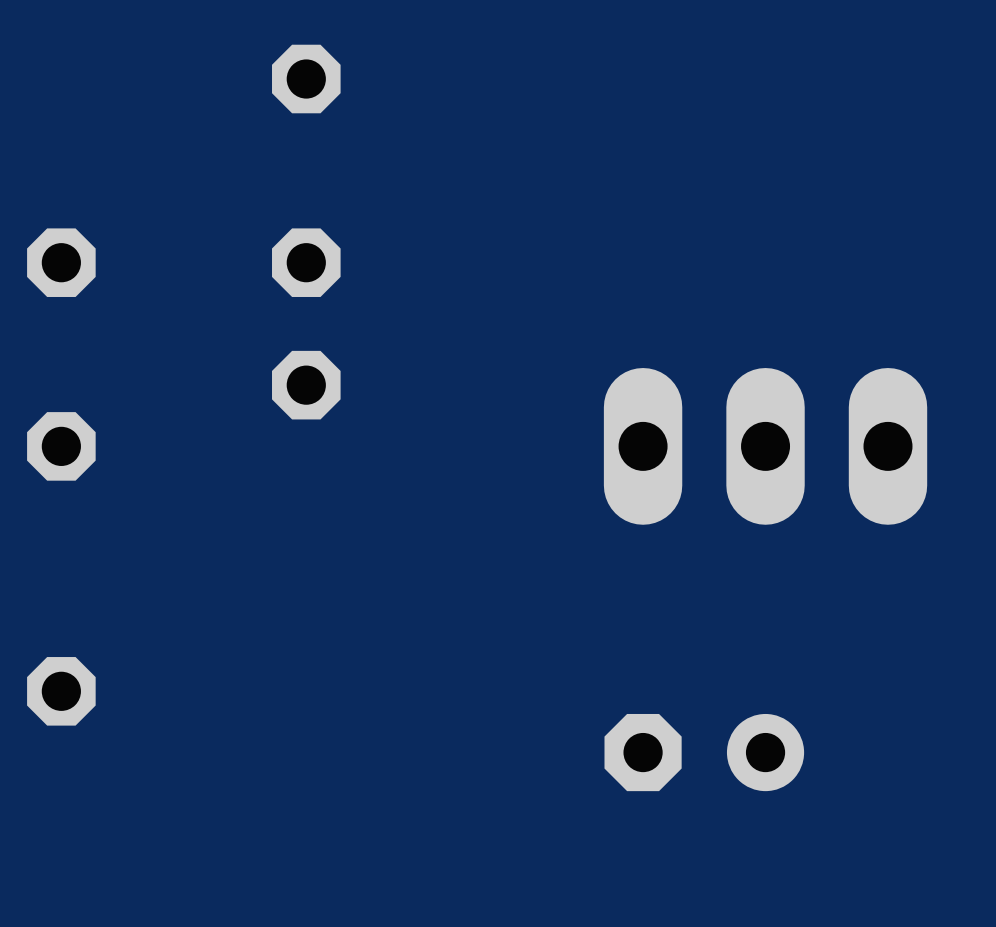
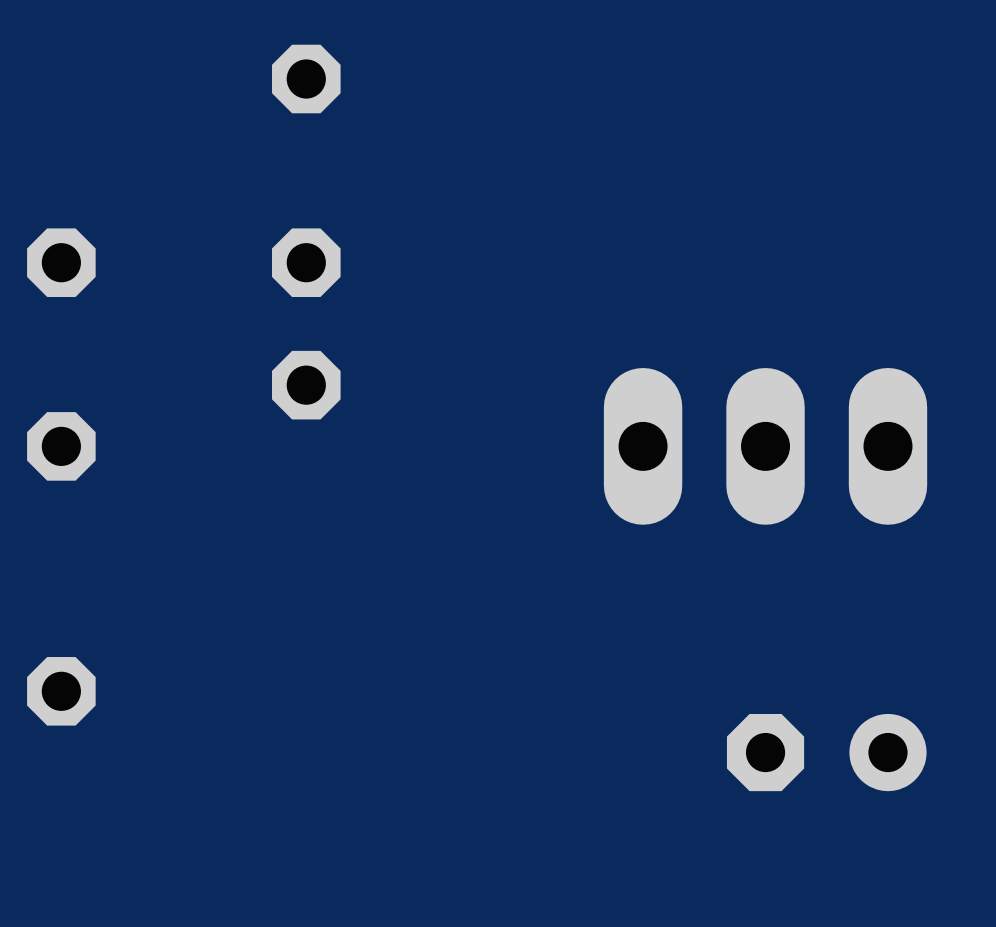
part position: (704, 752) -> (826, 752)

